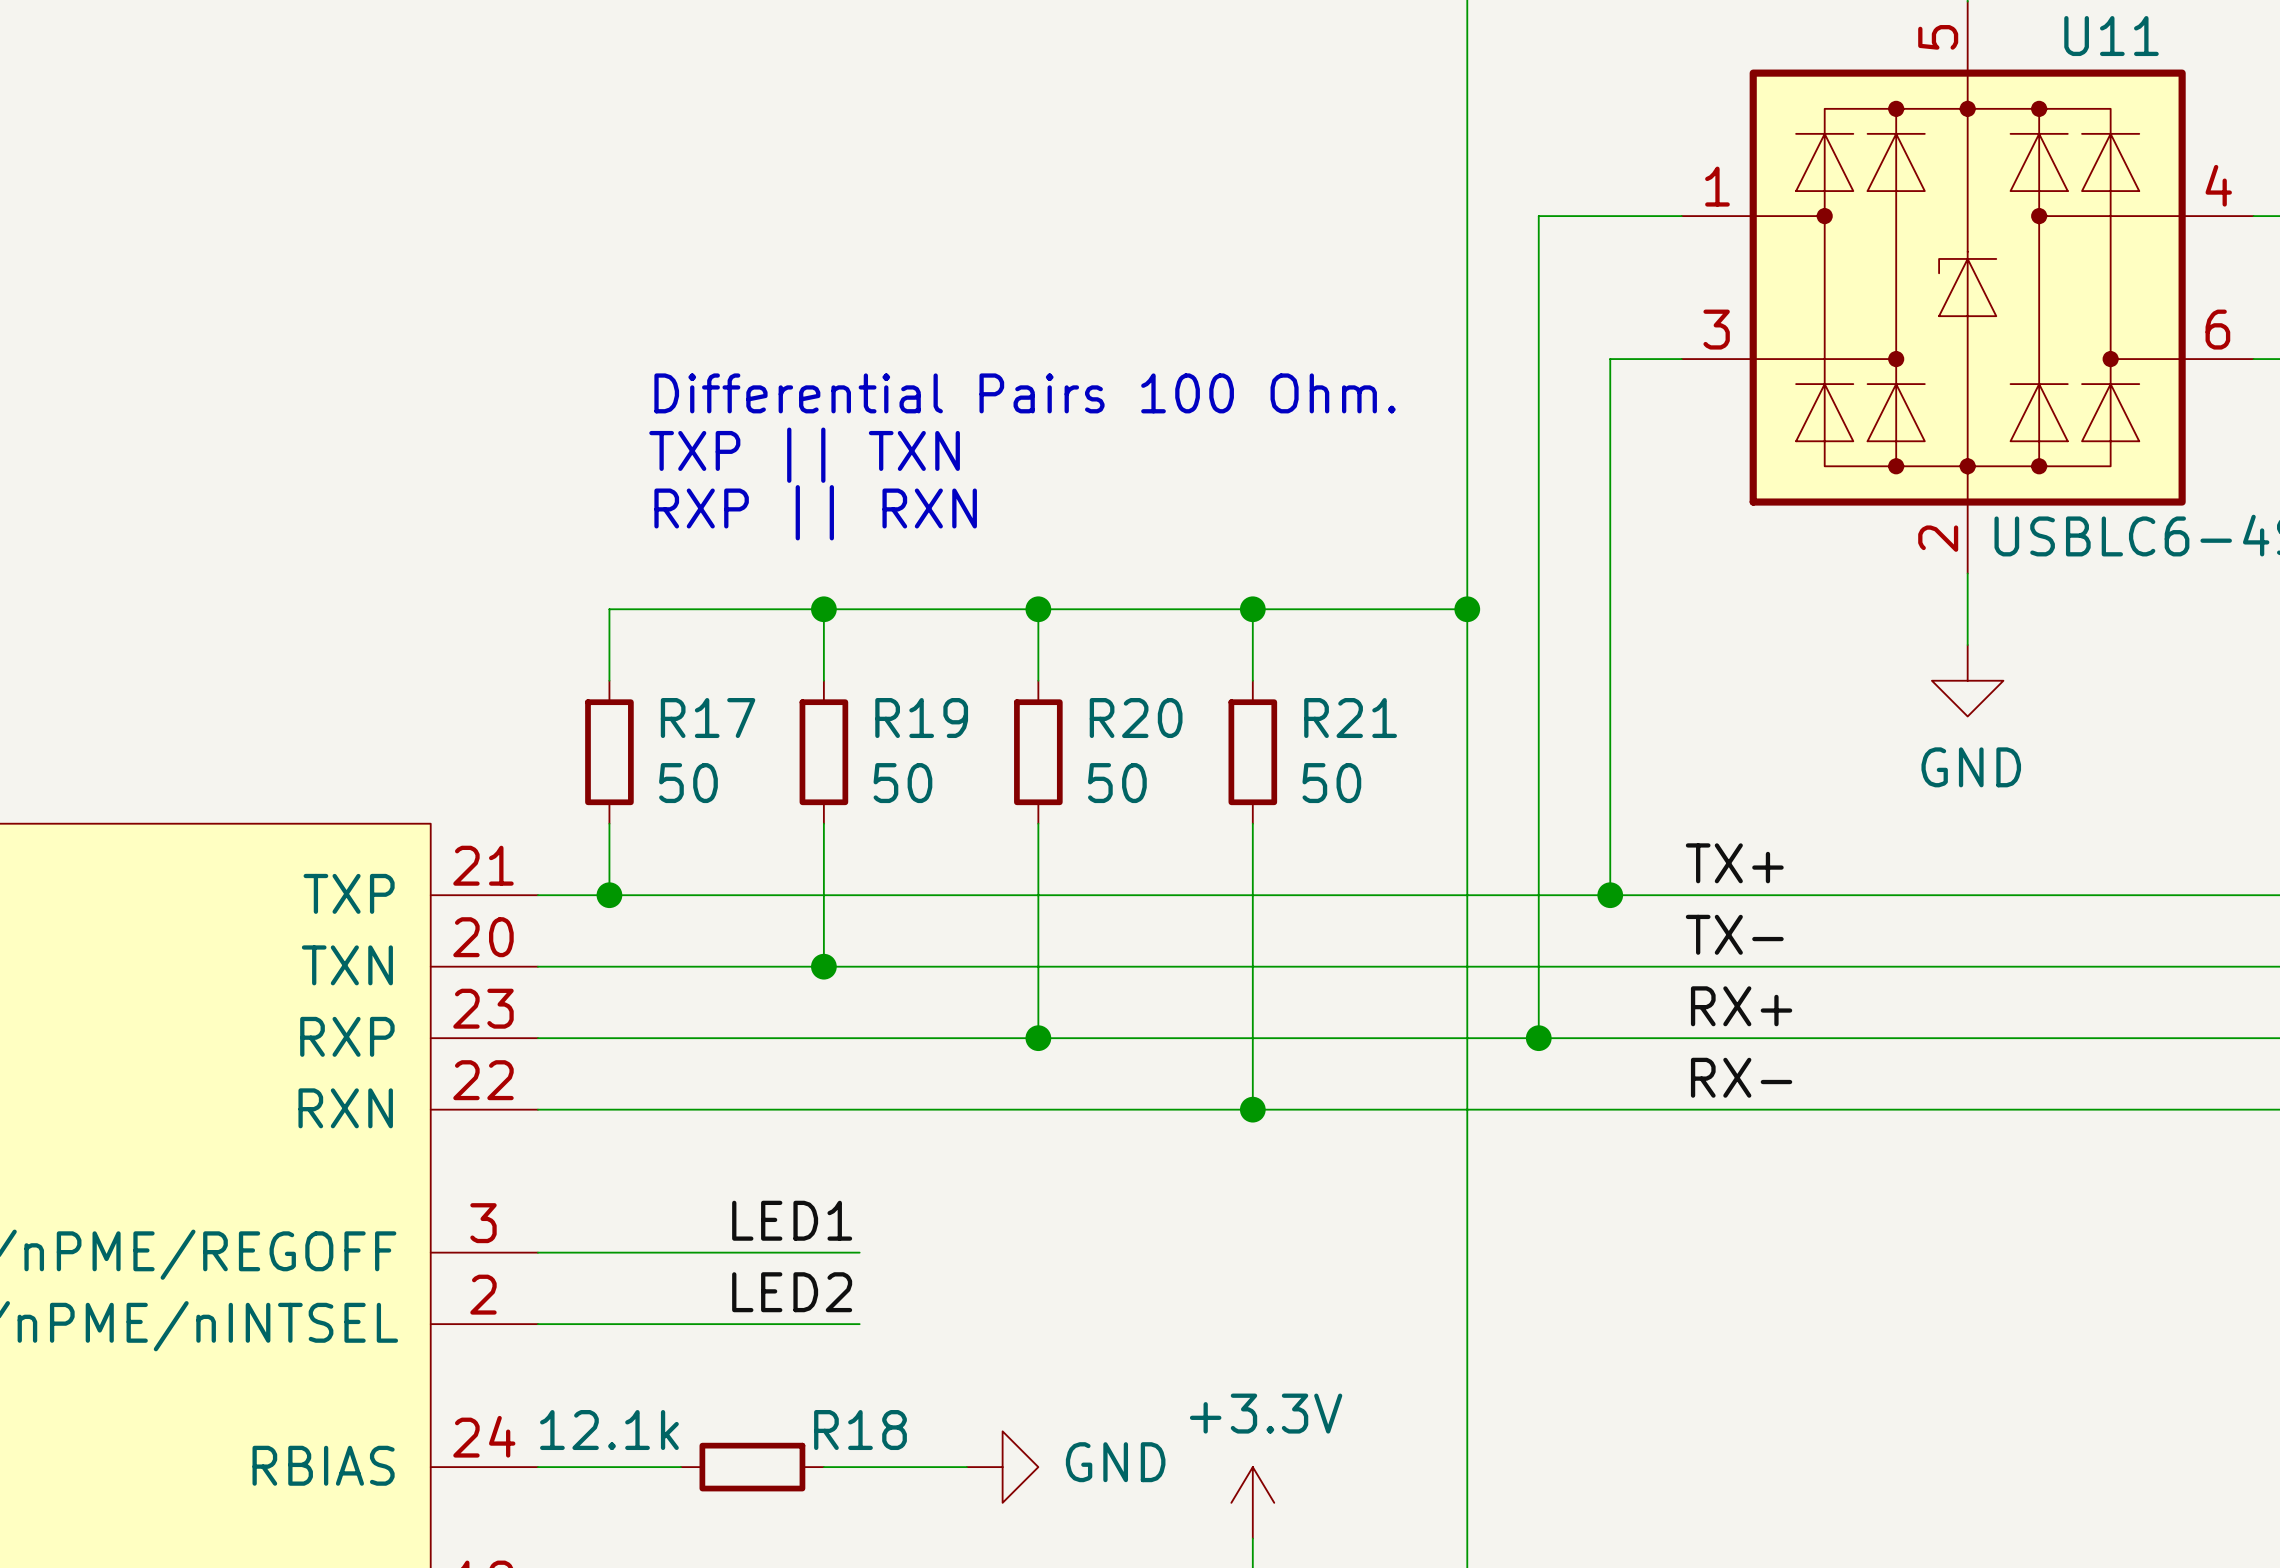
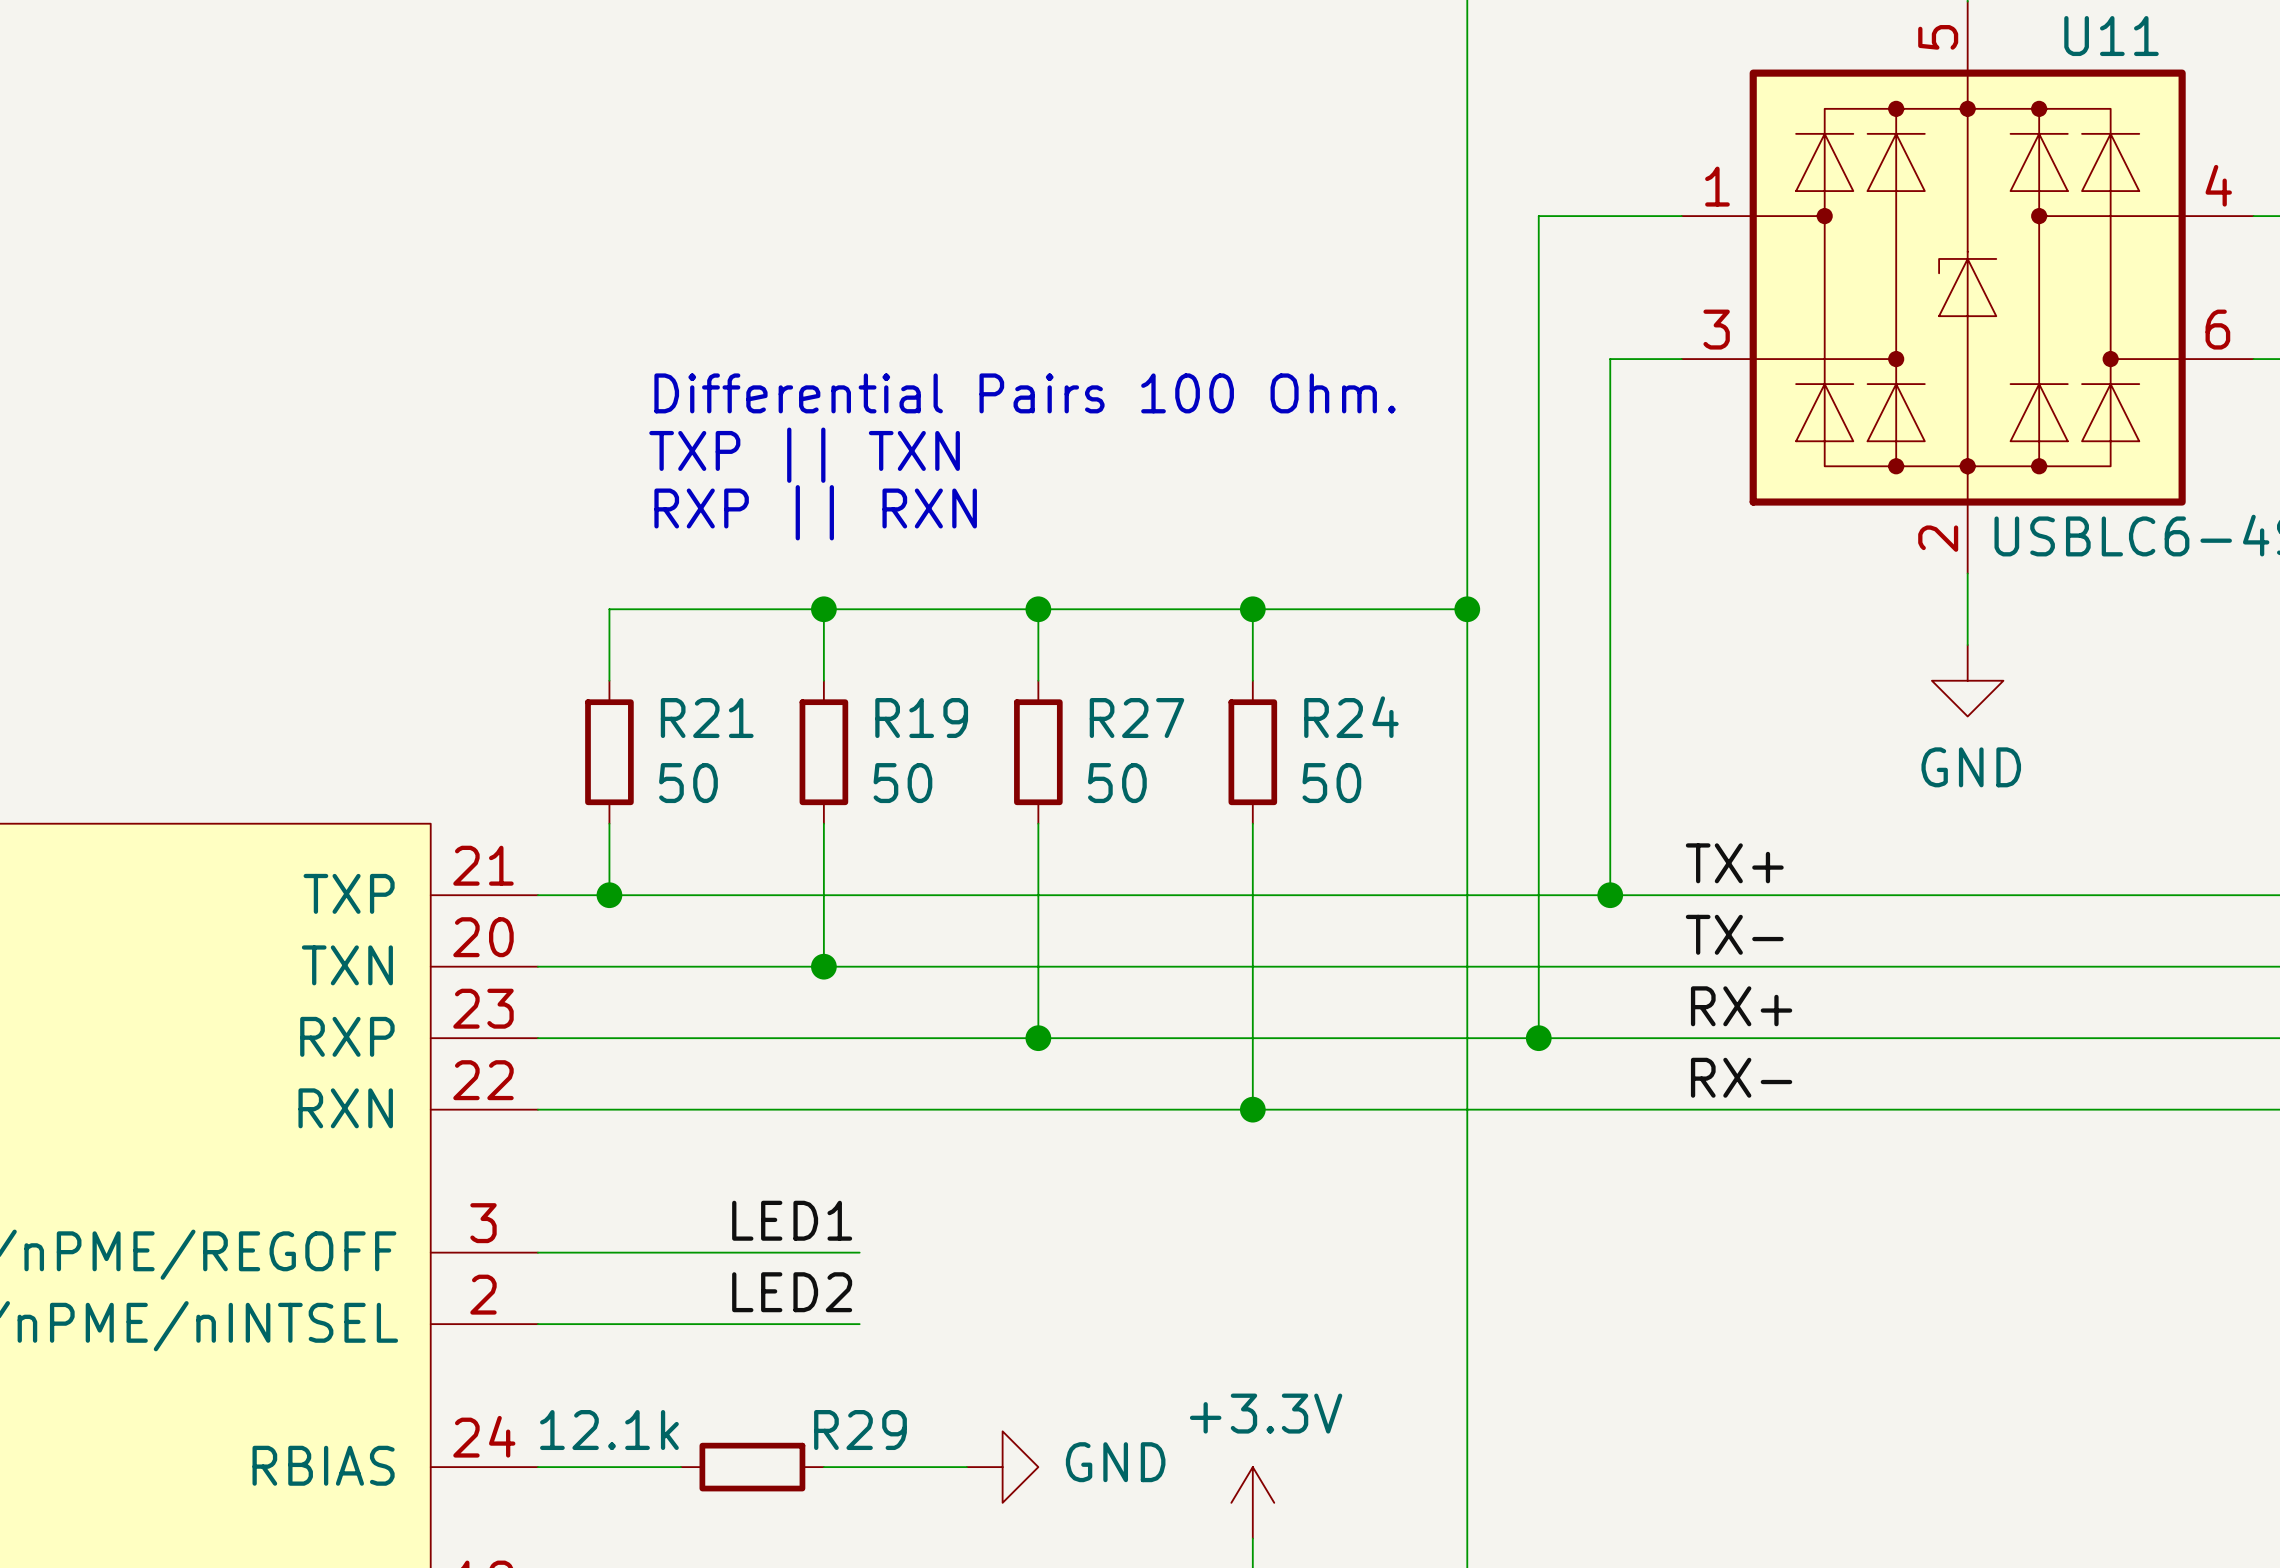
R17 name: R17 (708, 718) -> R21 (707, 718)
R20 name: R20 (1136, 718) -> R27 (1136, 718)
R21 name: R21 (1350, 718) -> R24 (1351, 717)
R18 name: R18 (860, 1430) -> R29 (860, 1430)

